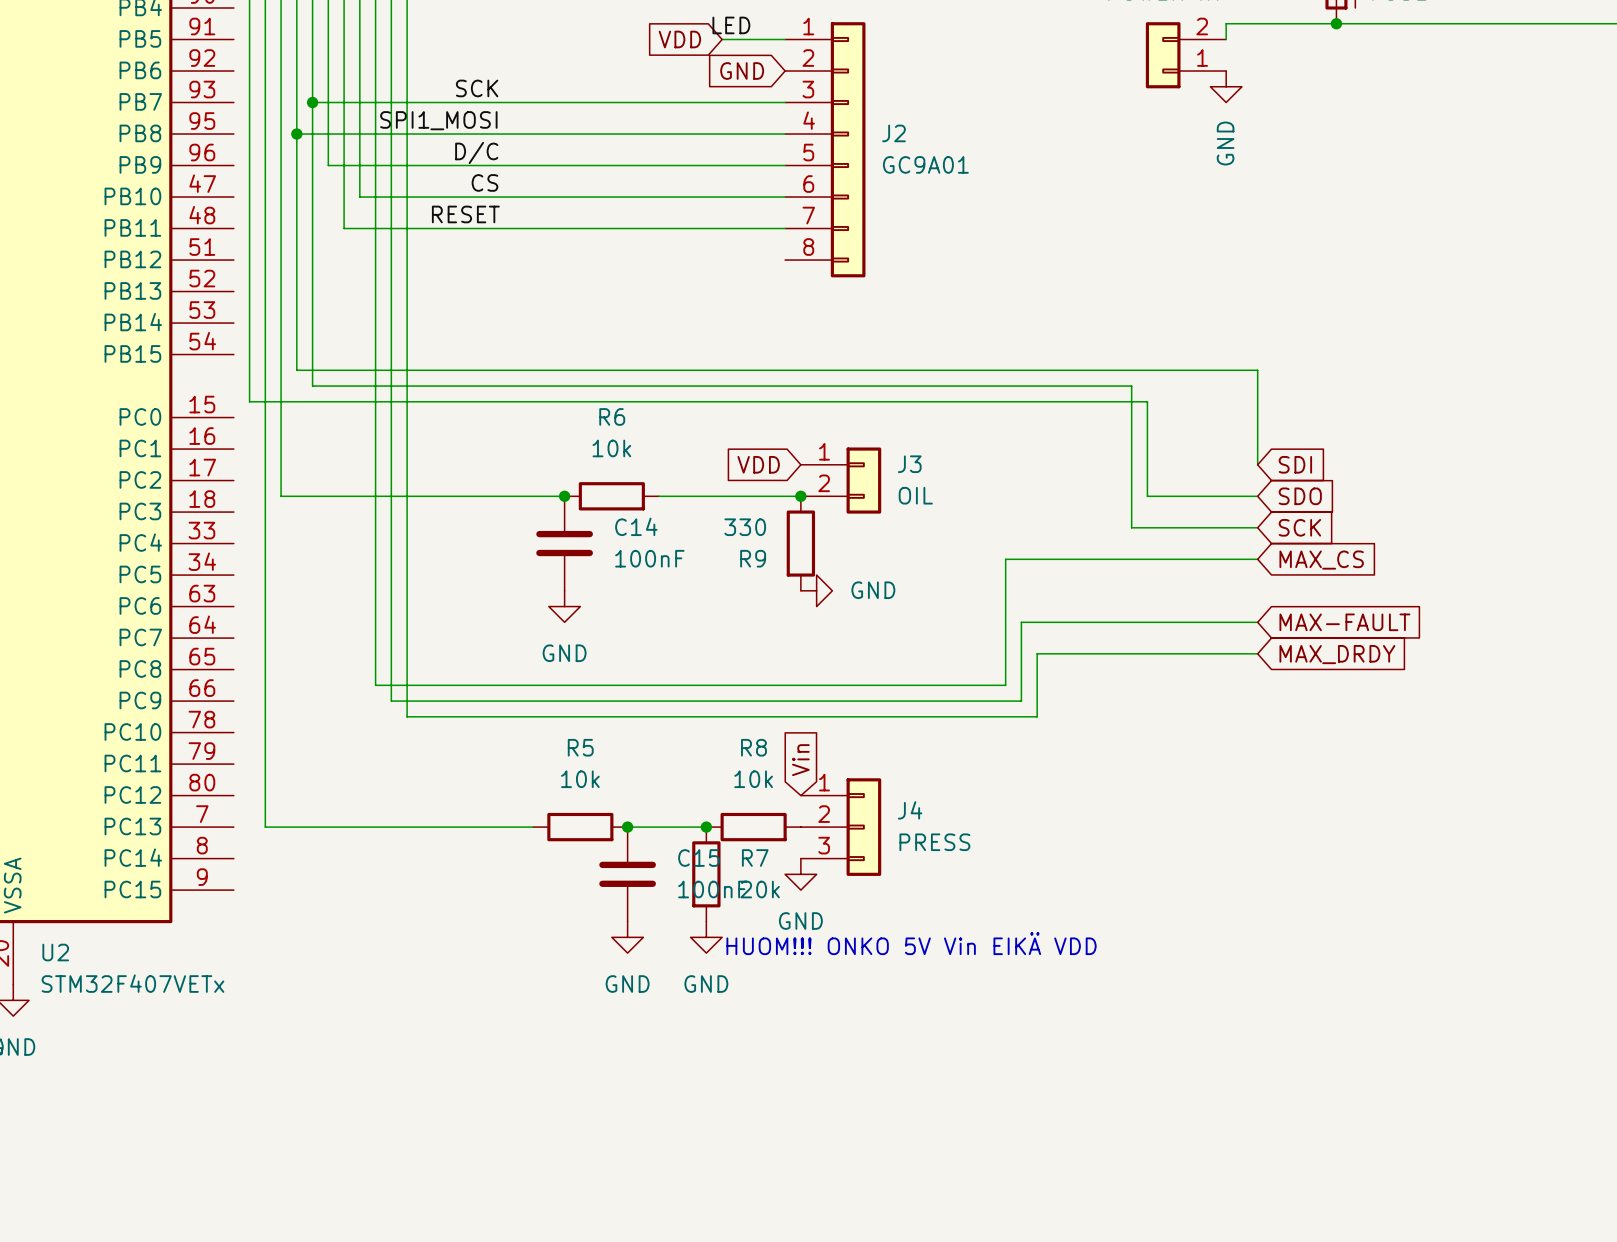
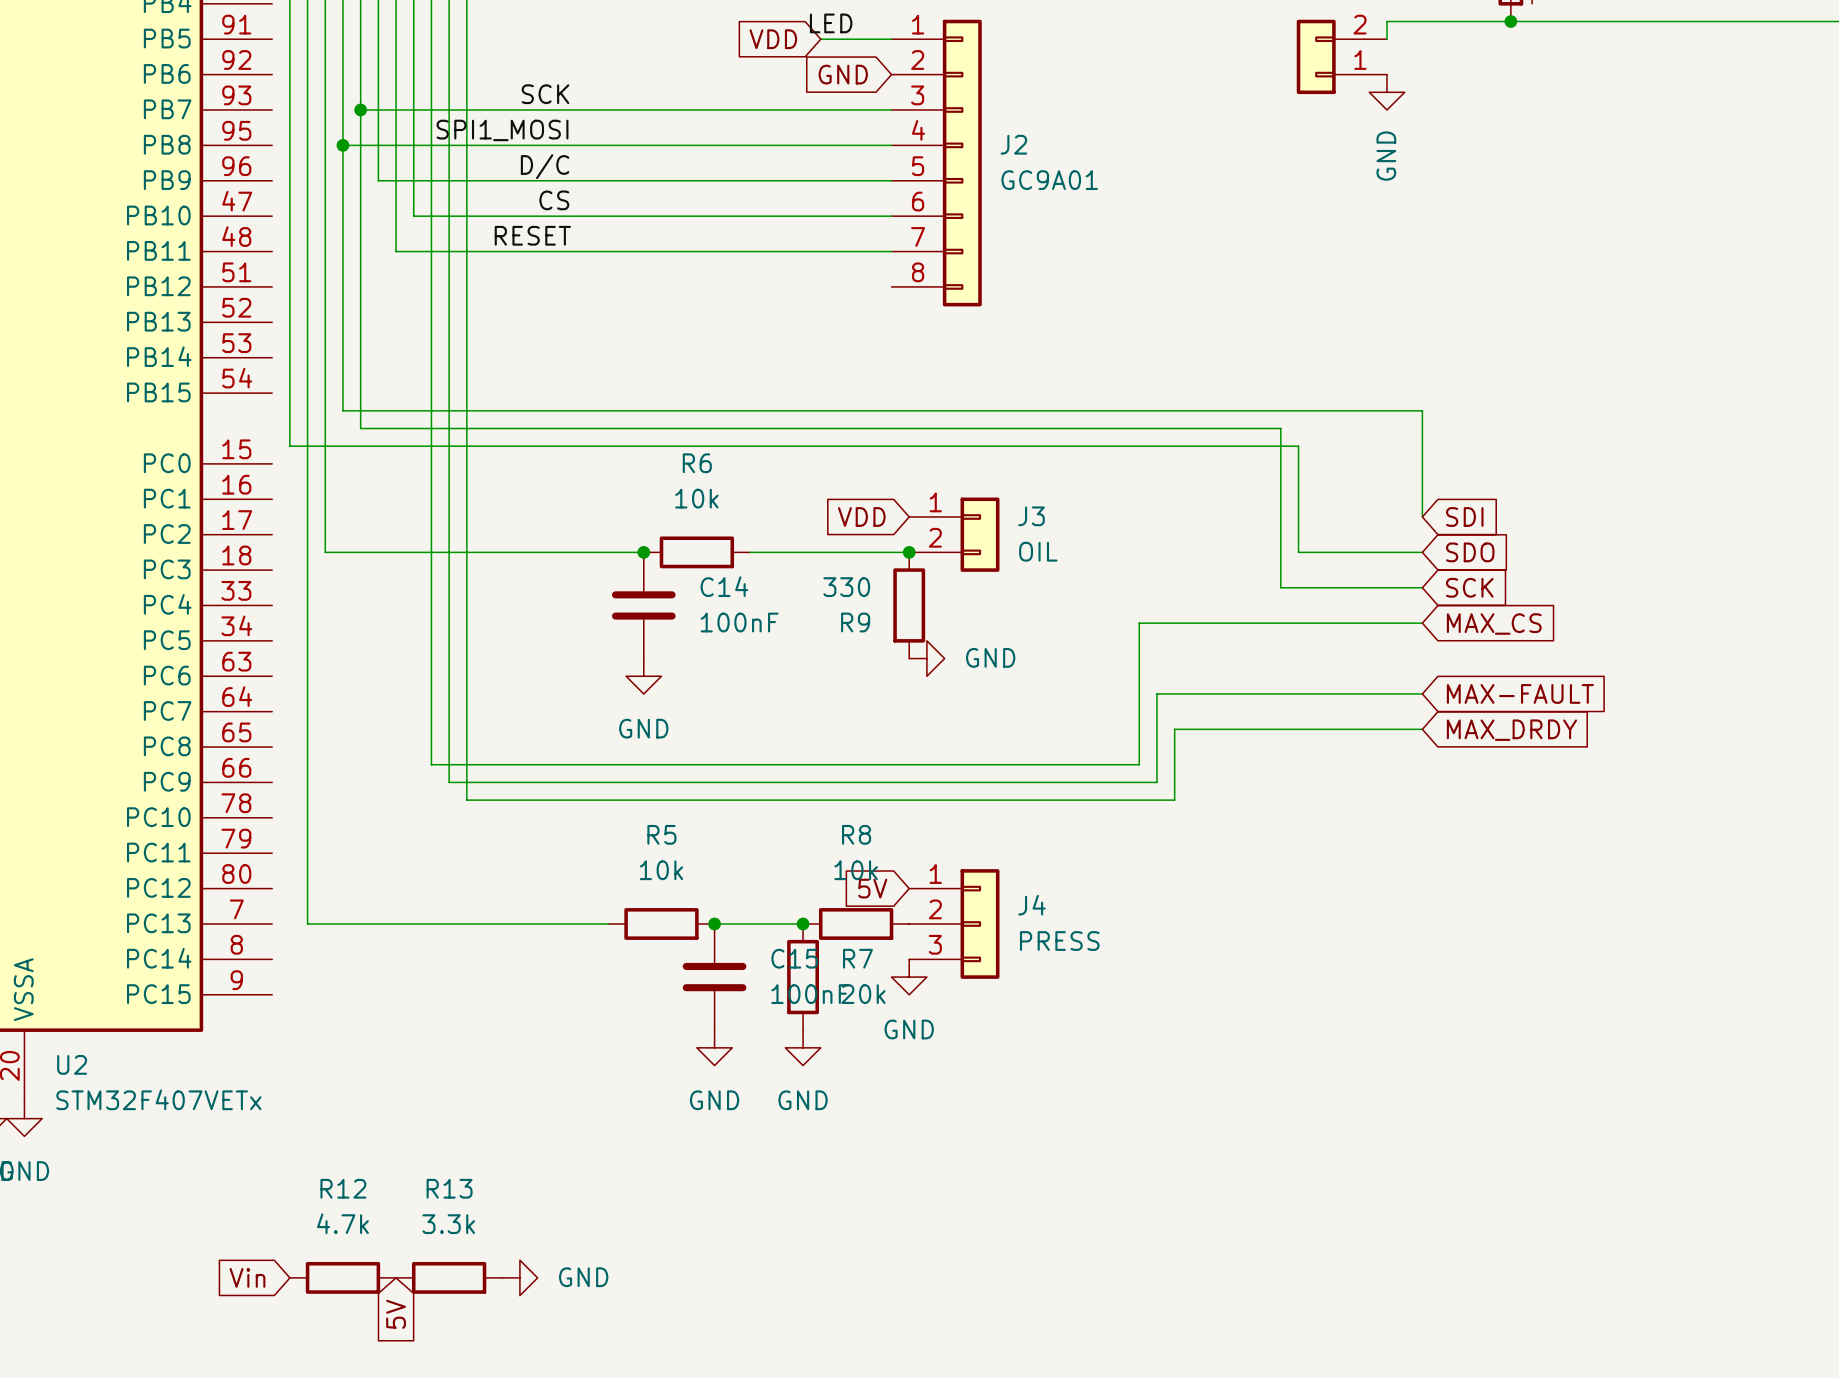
global label: Vin (800, 760) -> 5V (872, 888)
text: HUOM!!! ONKO 5V Vin EIKÄ VDD (911, 943) -> none
global label: none -> Vin (247, 1277)
R12: none -> 4.7k (342, 1277)
R13: none -> 3.3k (449, 1277)
power symbol: none -> GND (519, 1277)
global label: none -> 5V (396, 1314)

